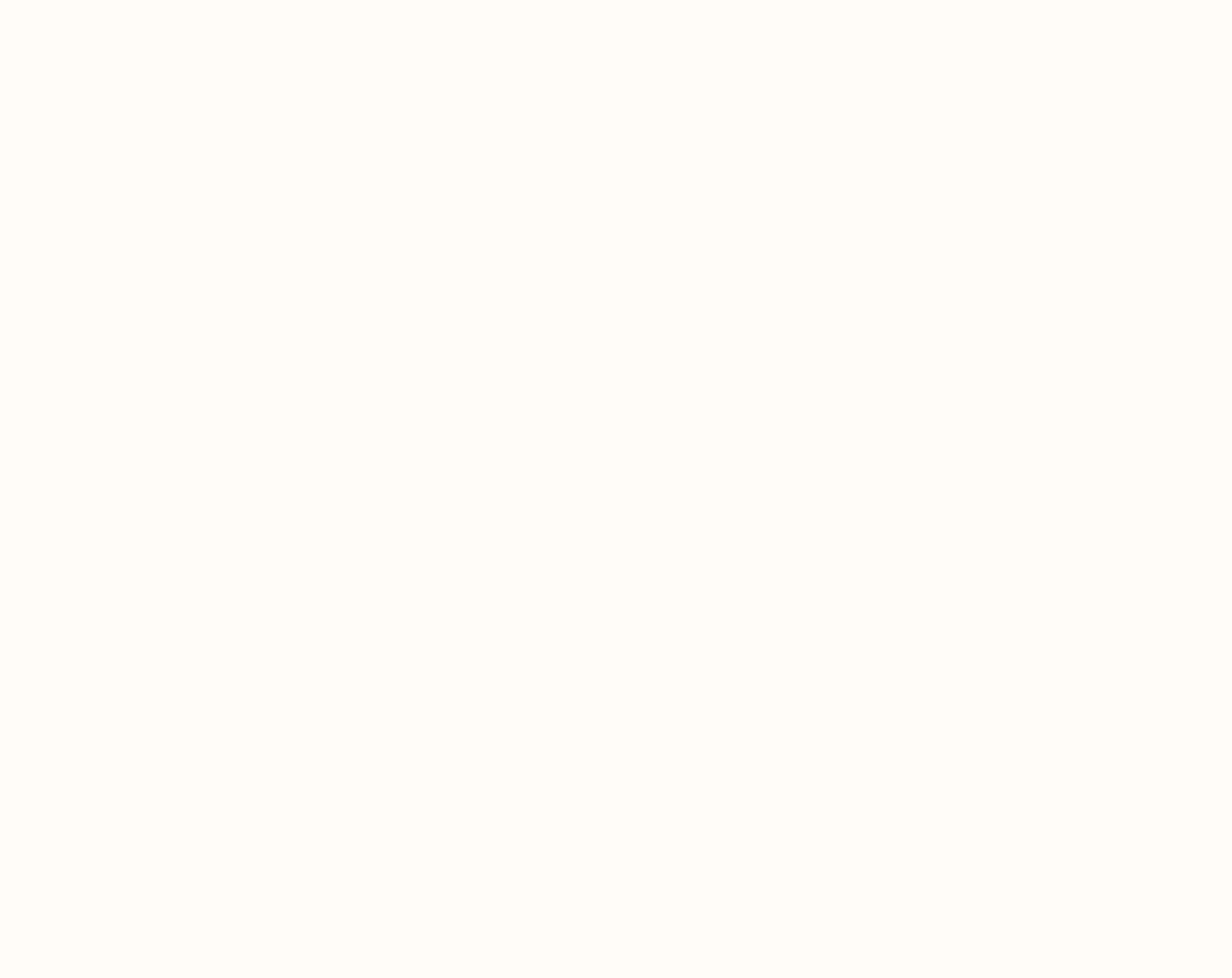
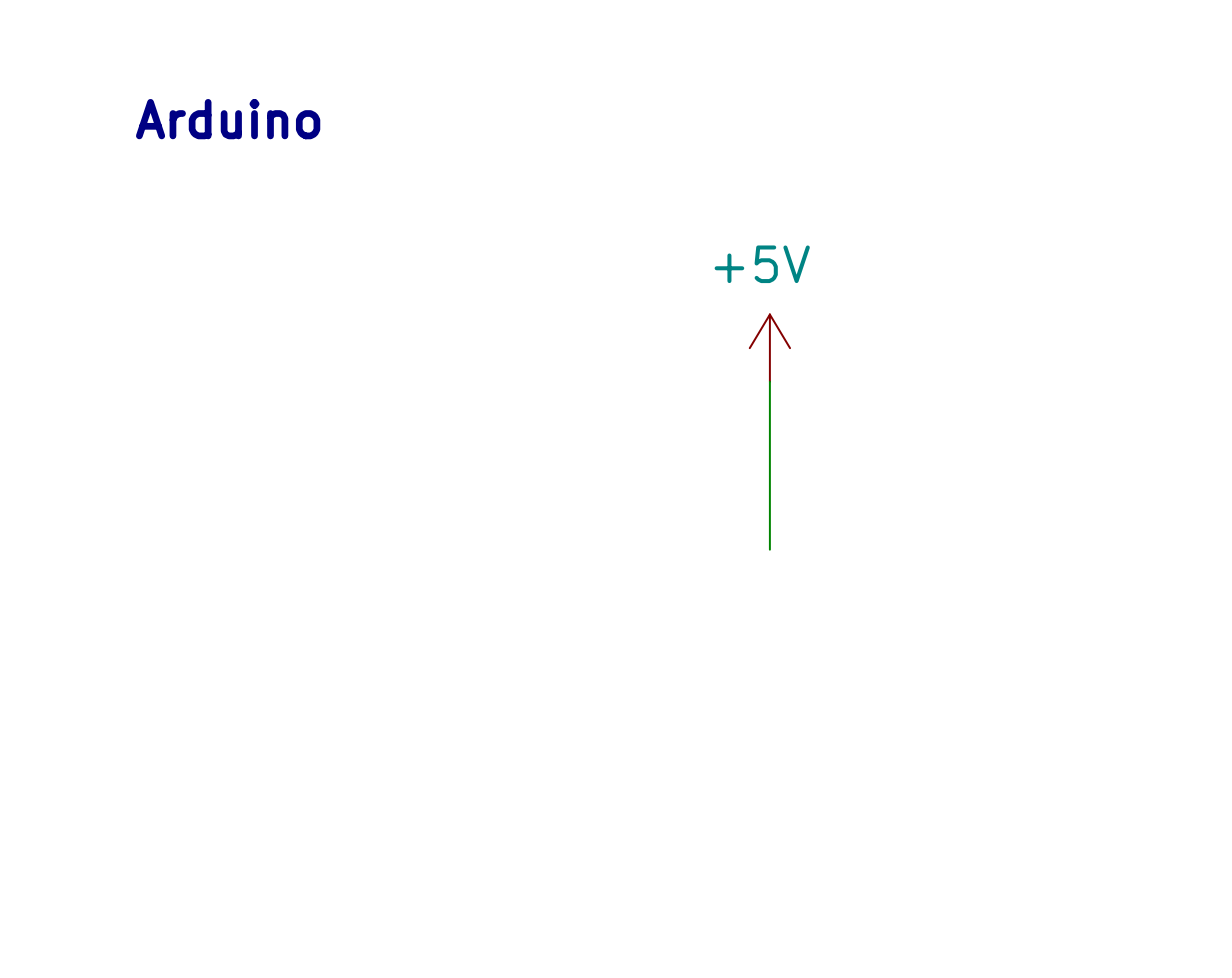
text: none -> Arduino (228, 119)
power symbol: none -> +5V (769, 348)
wire: none -> (769, 381) (769, 549)

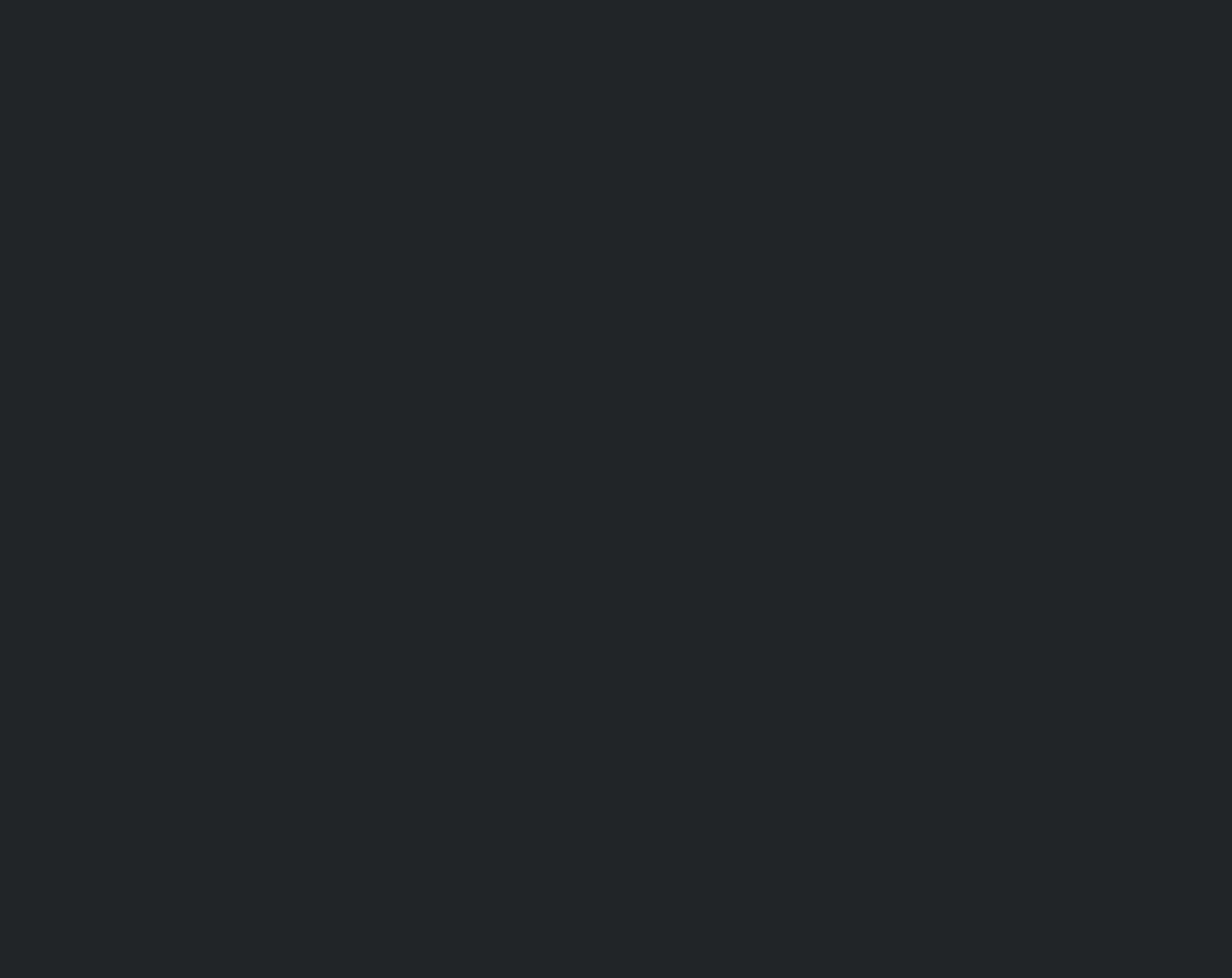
text: Arduino (228, 119) -> none
power symbol: +5V (769, 348) -> none
wire: (769, 381) (769, 549) -> none

